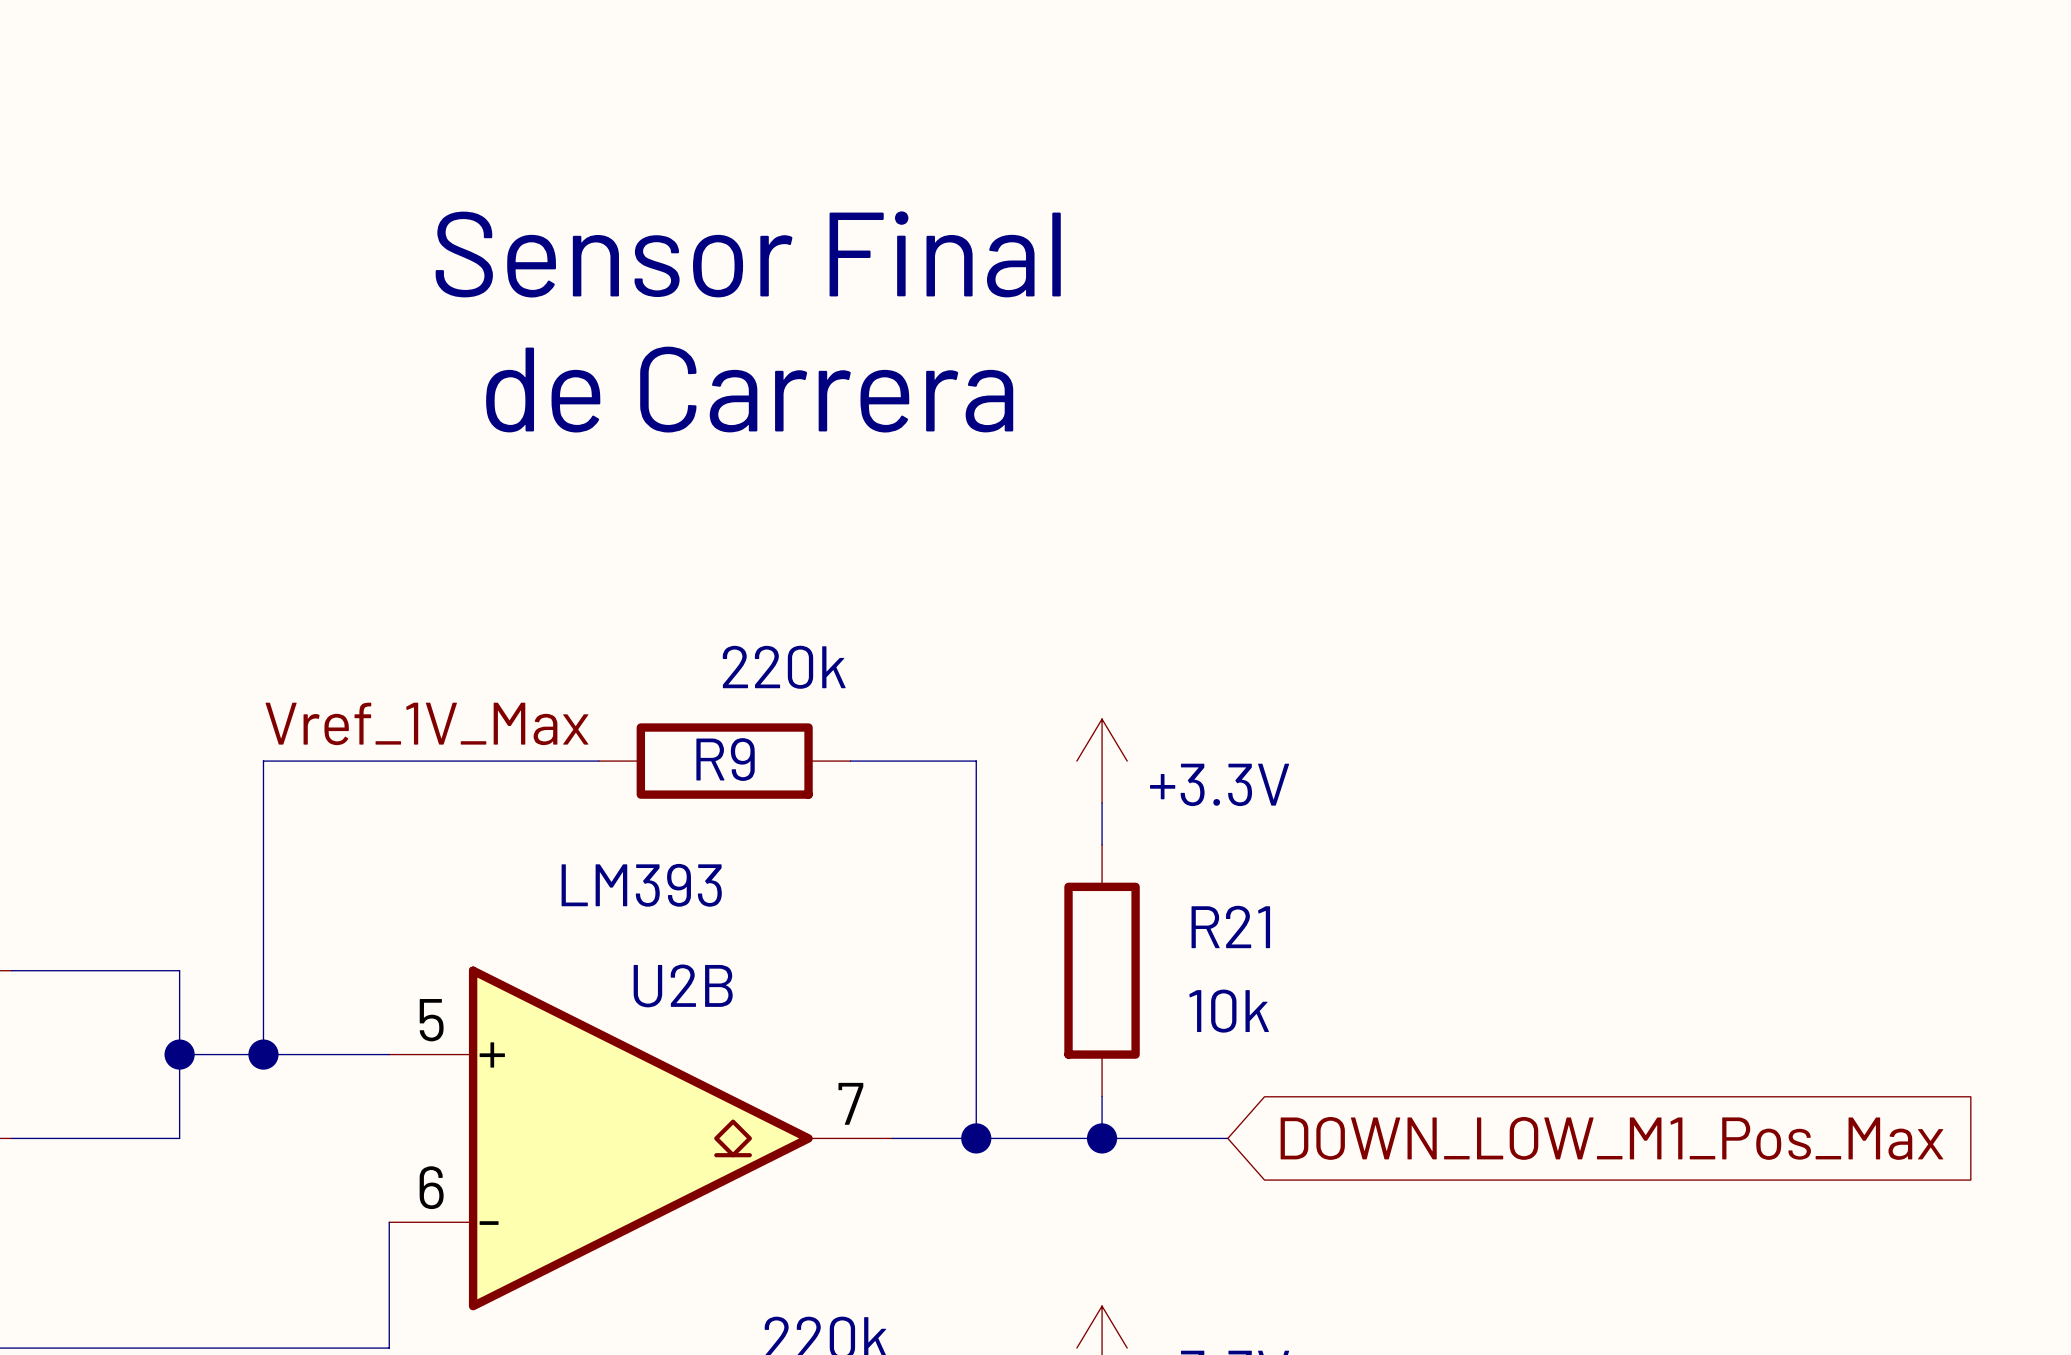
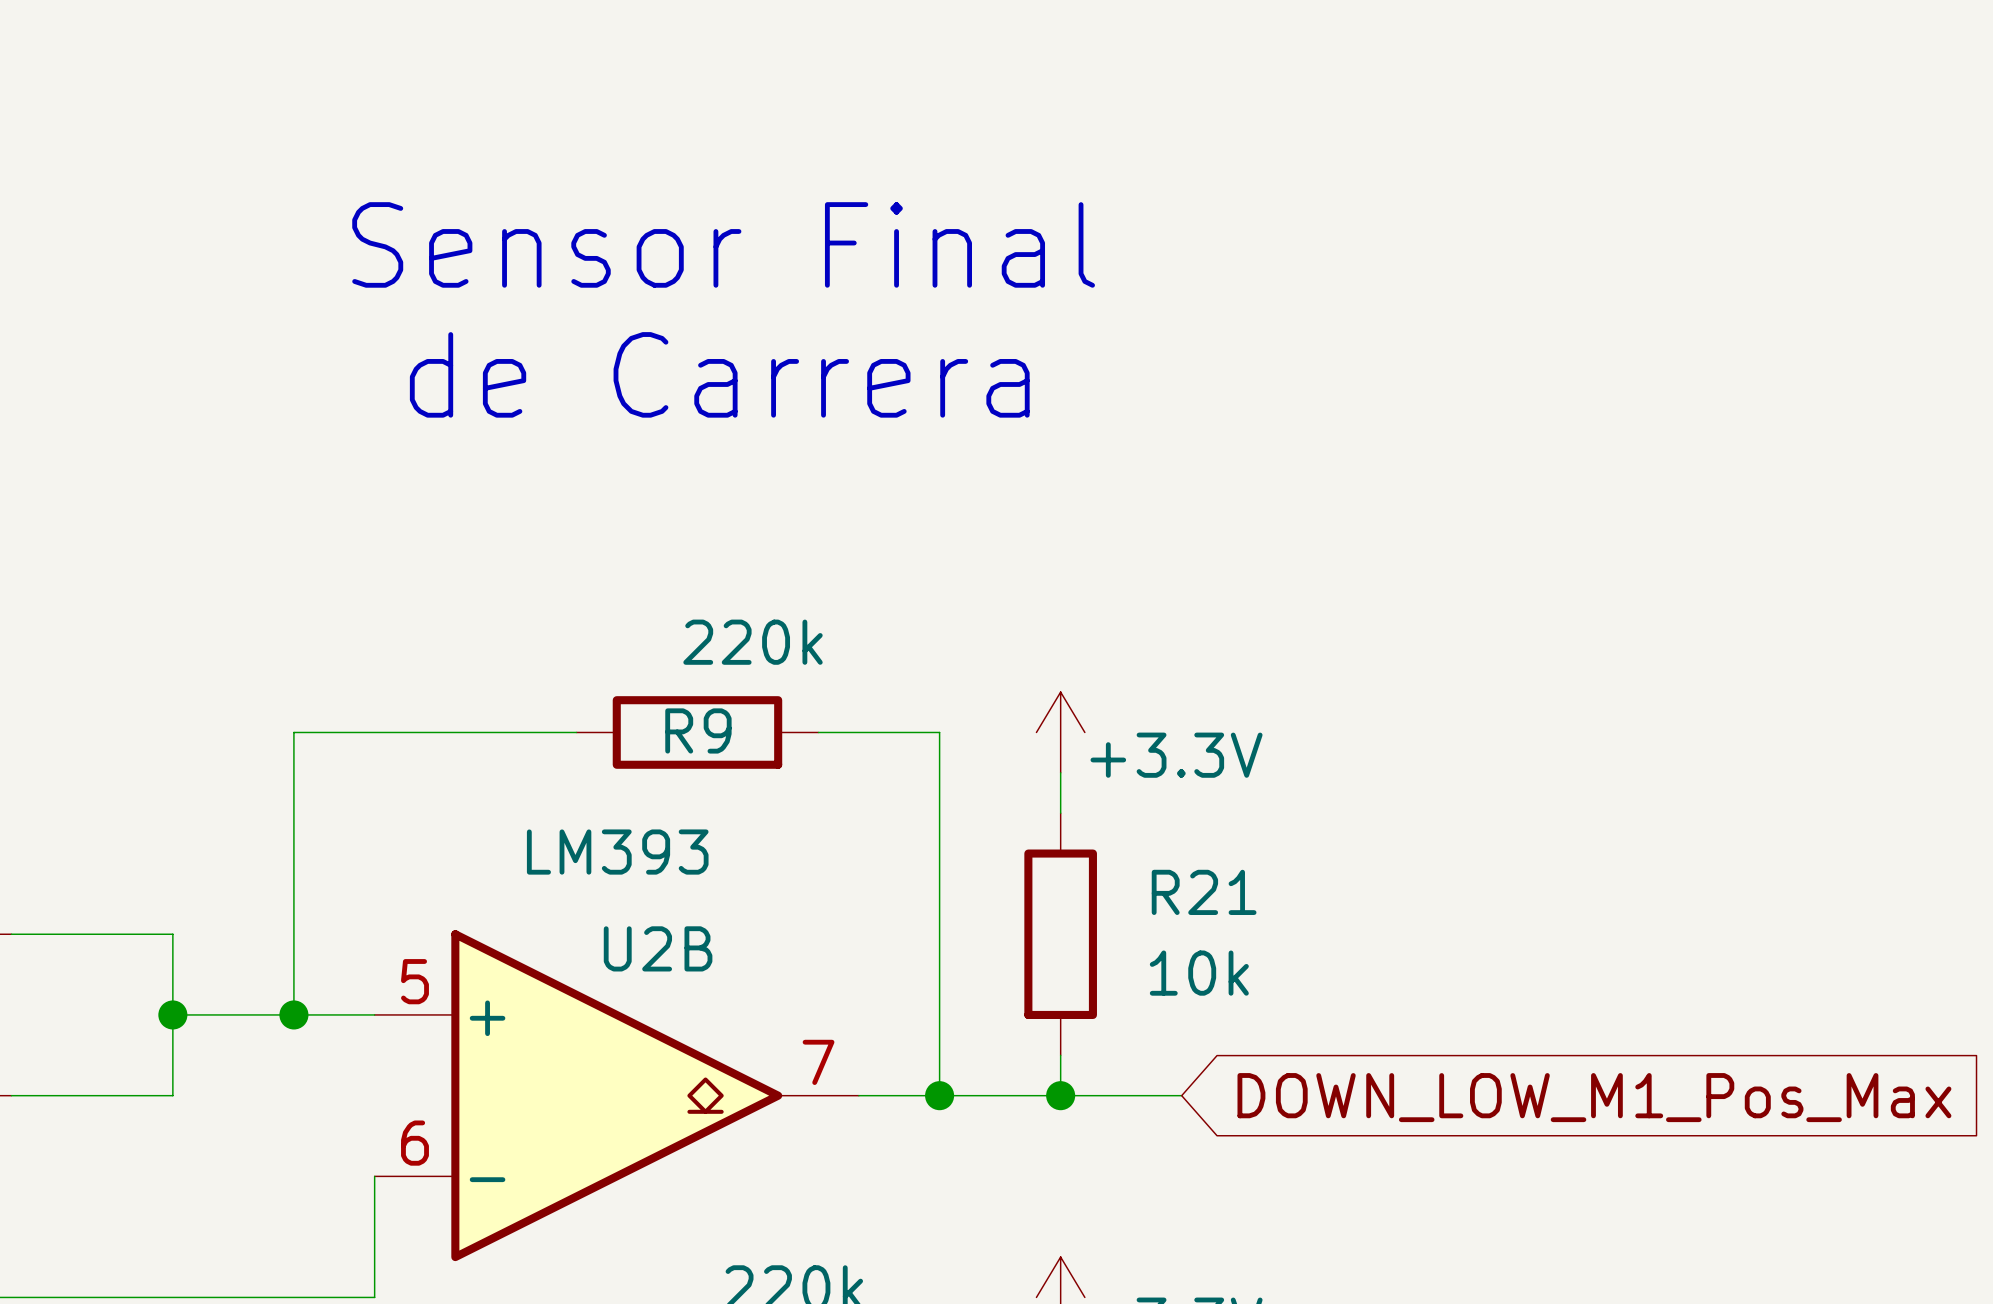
label: Vref_1V_Max (427, 723) -> none
wire: (305, 761) (263, 761) (263, 1054) -> (293, 732) (293, 1014)
junction position: (263, 1054) -> (293, 1014)

